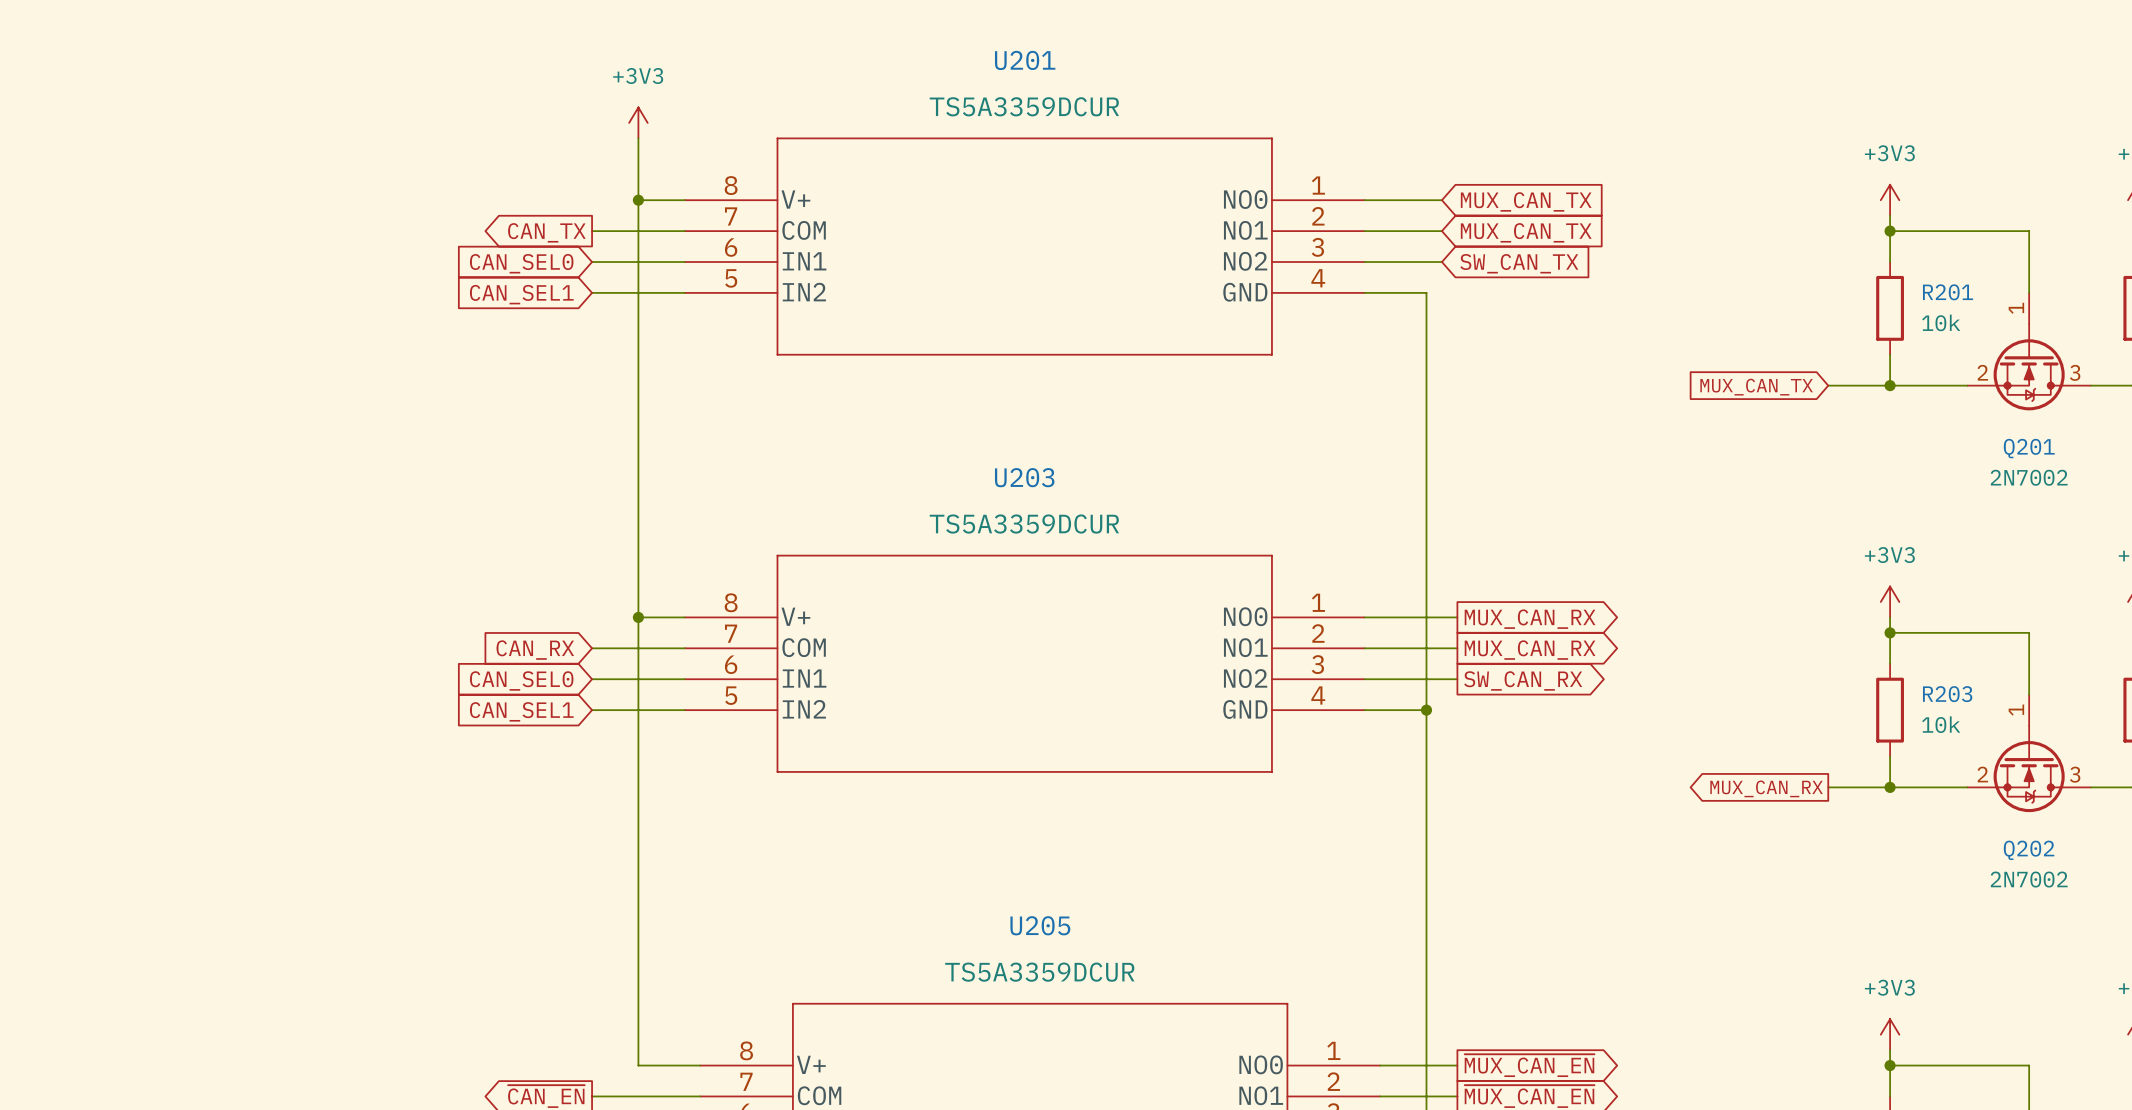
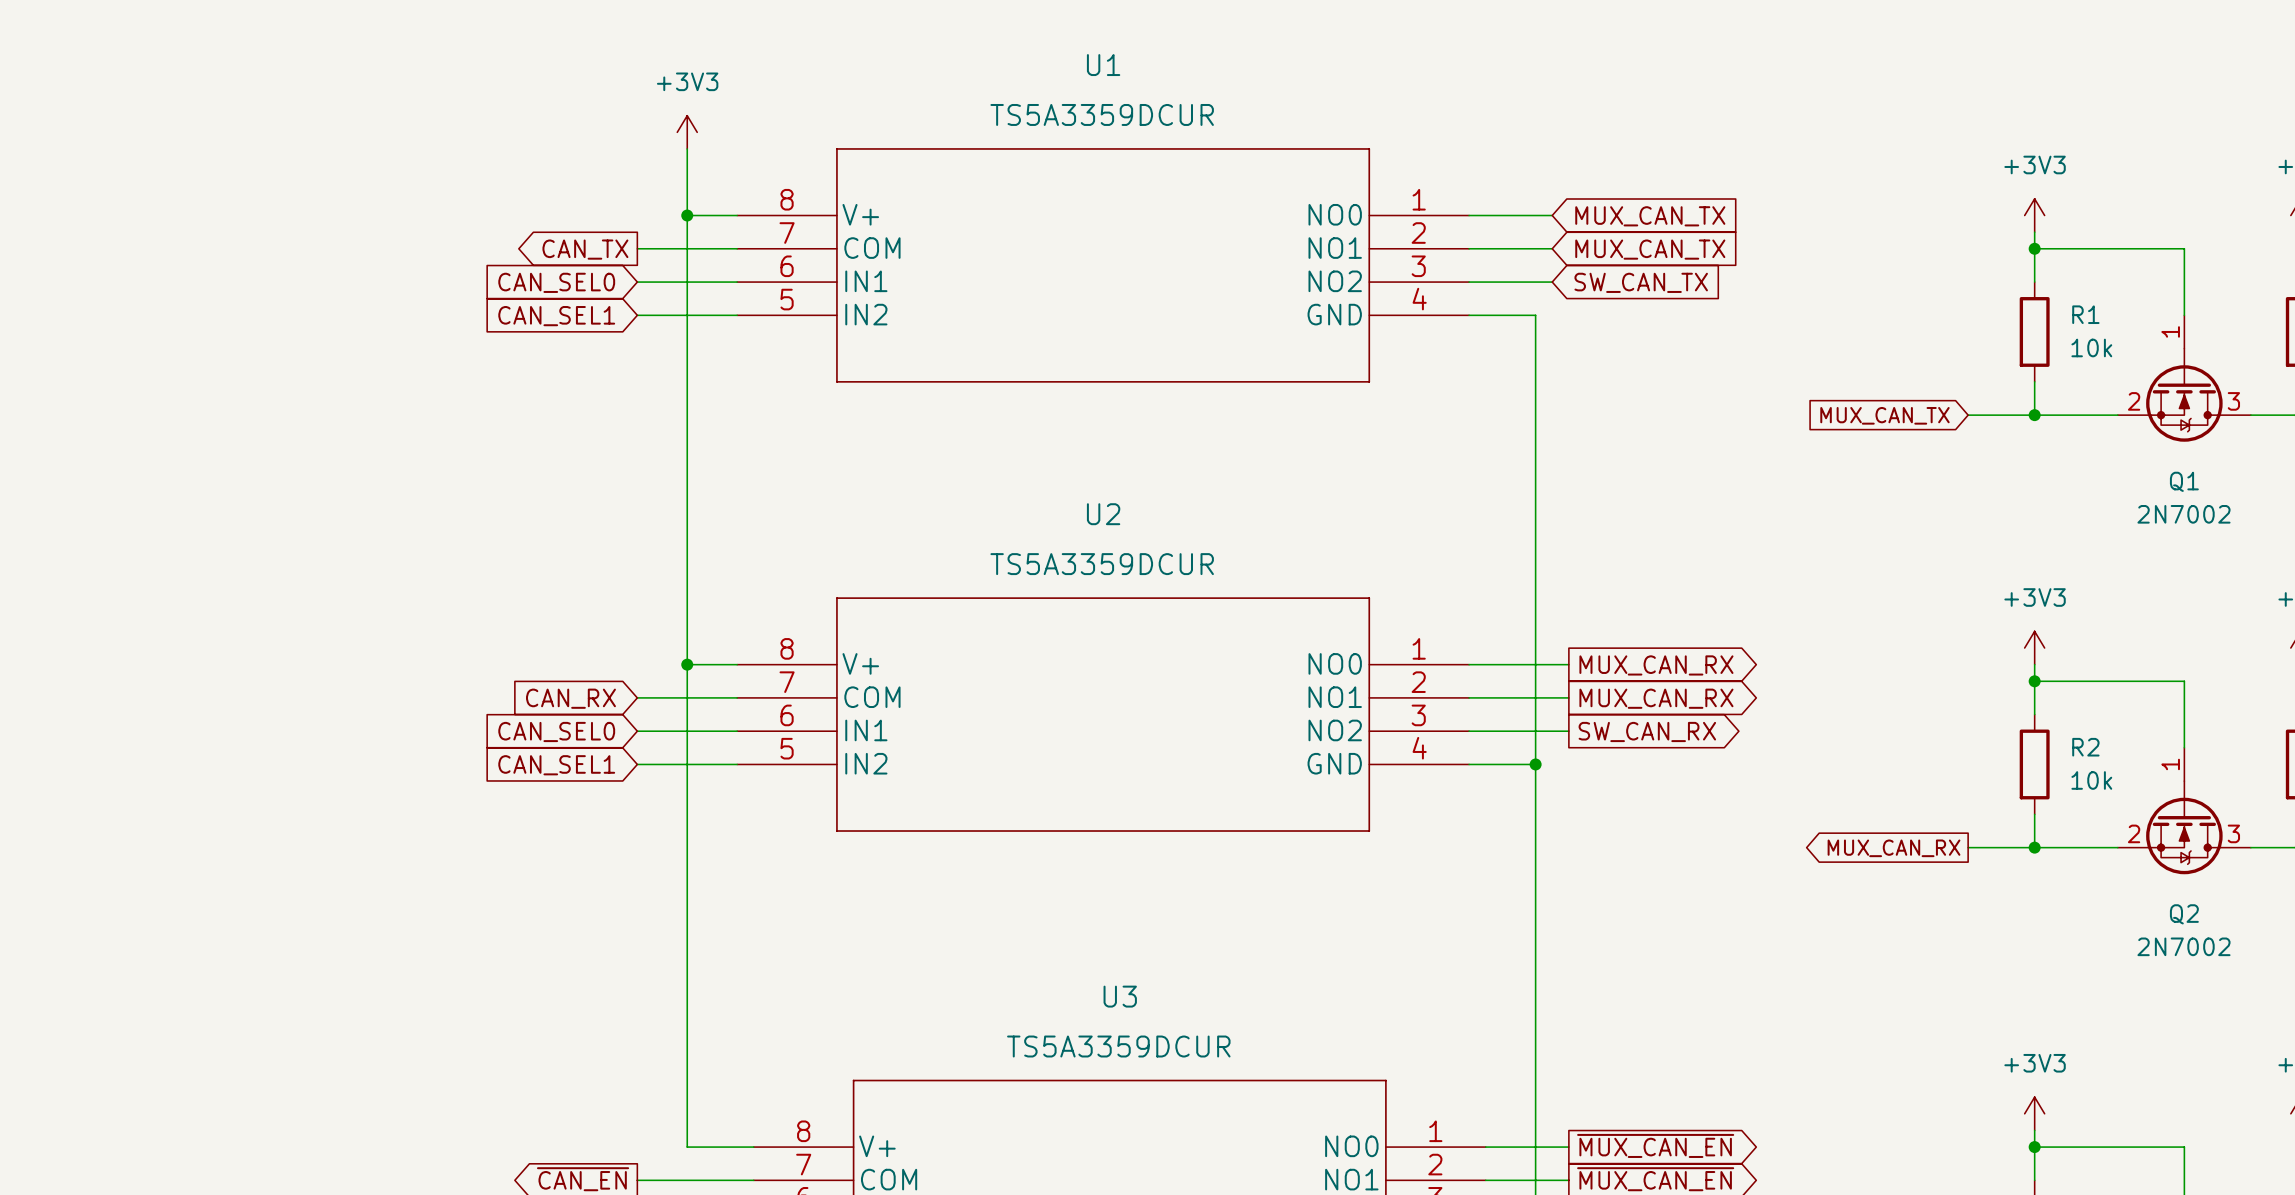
U201 name: U201 (1025, 60) -> U1 (1103, 65)
R201 name: R201 (1948, 292) -> R1 (2085, 314)
Q201 name: Q201 (2029, 448) -> Q1 (2184, 481)
U203 name: U203 (1024, 477) -> U2 (1103, 514)
R203 name: R203 (1947, 694) -> R2 (2085, 747)
Q202 name: Q202 (2029, 850) -> Q2 (2184, 914)
U205 name: U205 (1040, 925) -> U3 (1120, 996)

